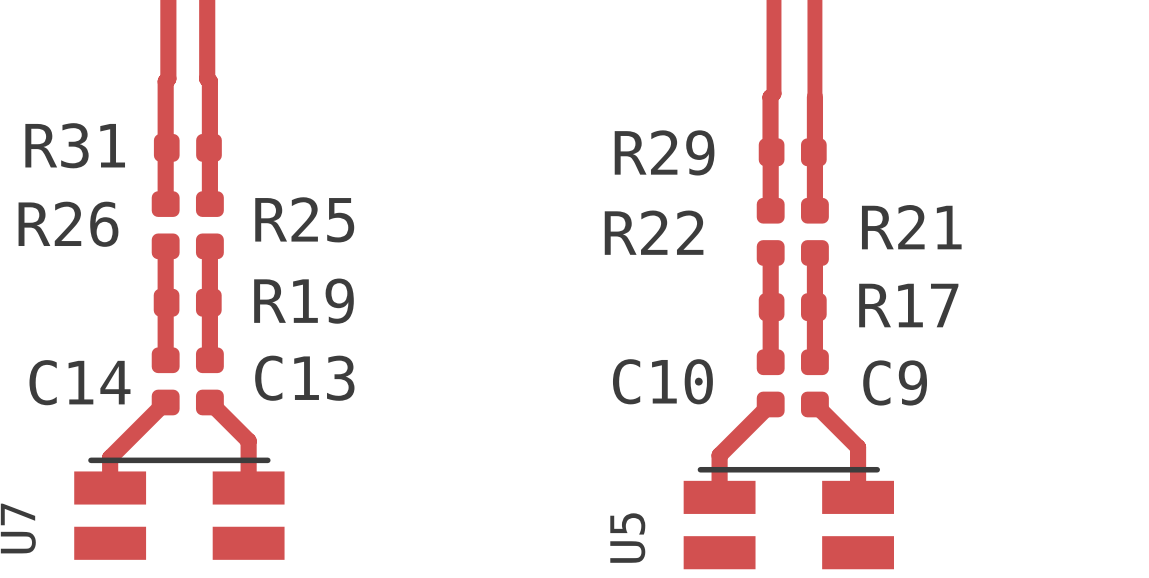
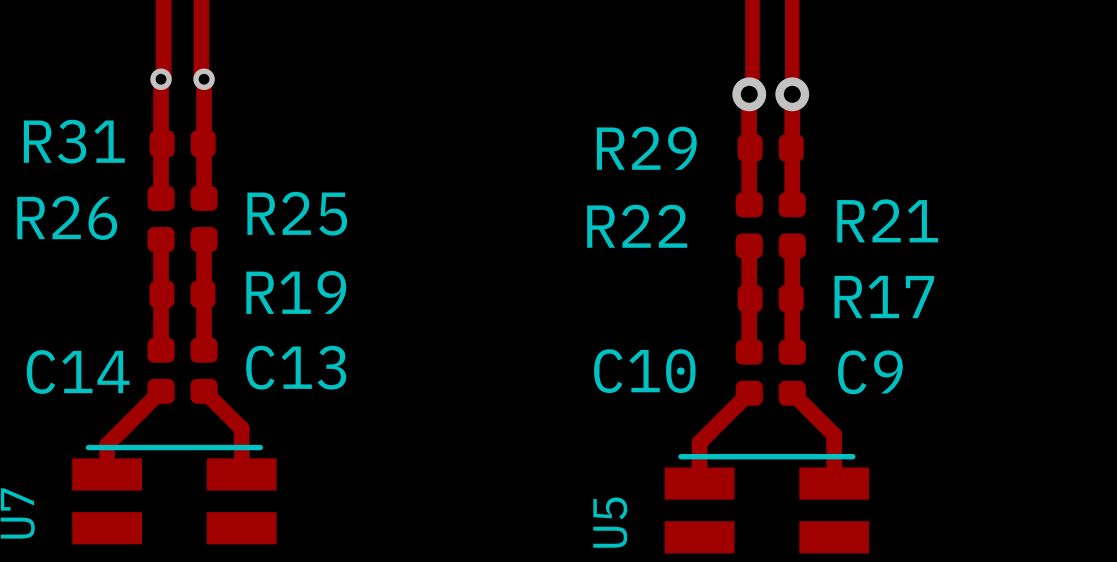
via: none -> (161, 79)
via: none -> (204, 79)
via: none -> (749, 94)
via: none -> (792, 94)

